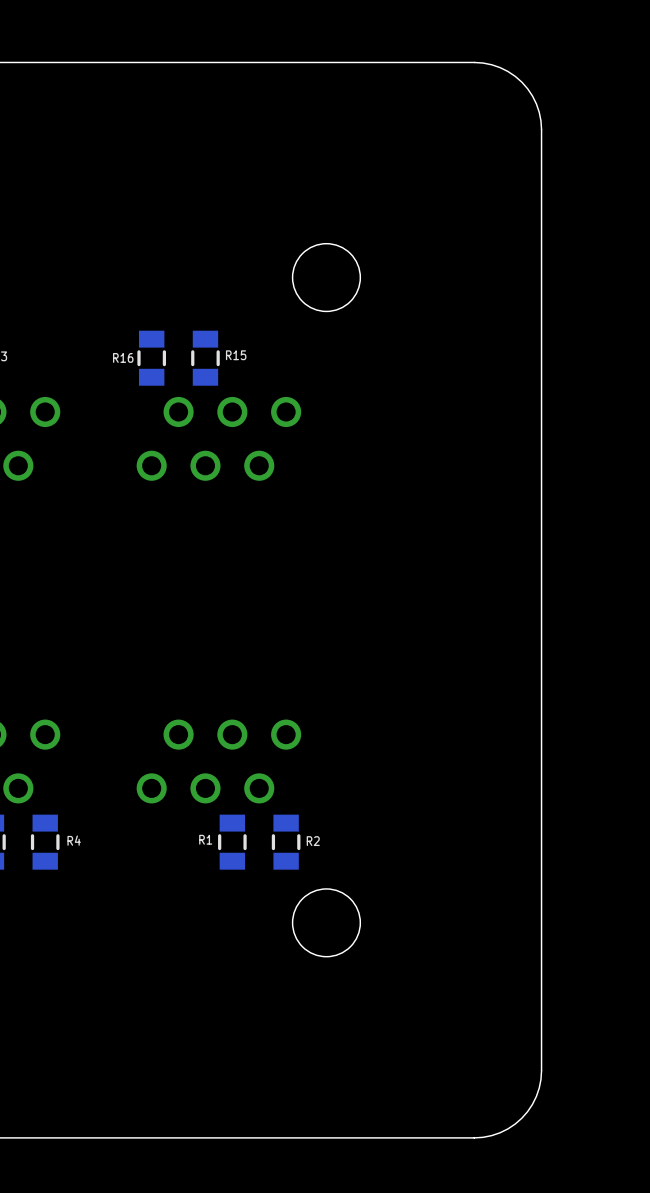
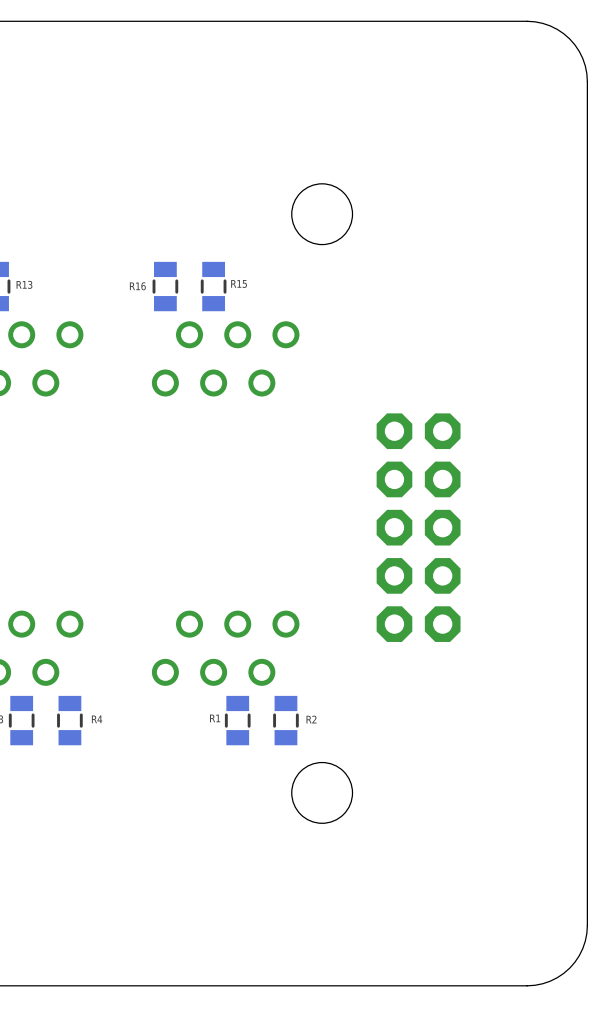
board edge: (474, 62) (500, 67) (521, 82) (536, 103) (541, 129) (540, 1079) (536, 1096) (521, 1118) (500, 1132) (474, 1137) -> (454, 21) (527, 21) (550, 25) (563, 33) (574, 44) (585, 65) (587, 81) (586, 933) (582, 948) (574, 962) (563, 973) (550, 981) (527, 985) (454, 985)
part: none -> (418, 527)

